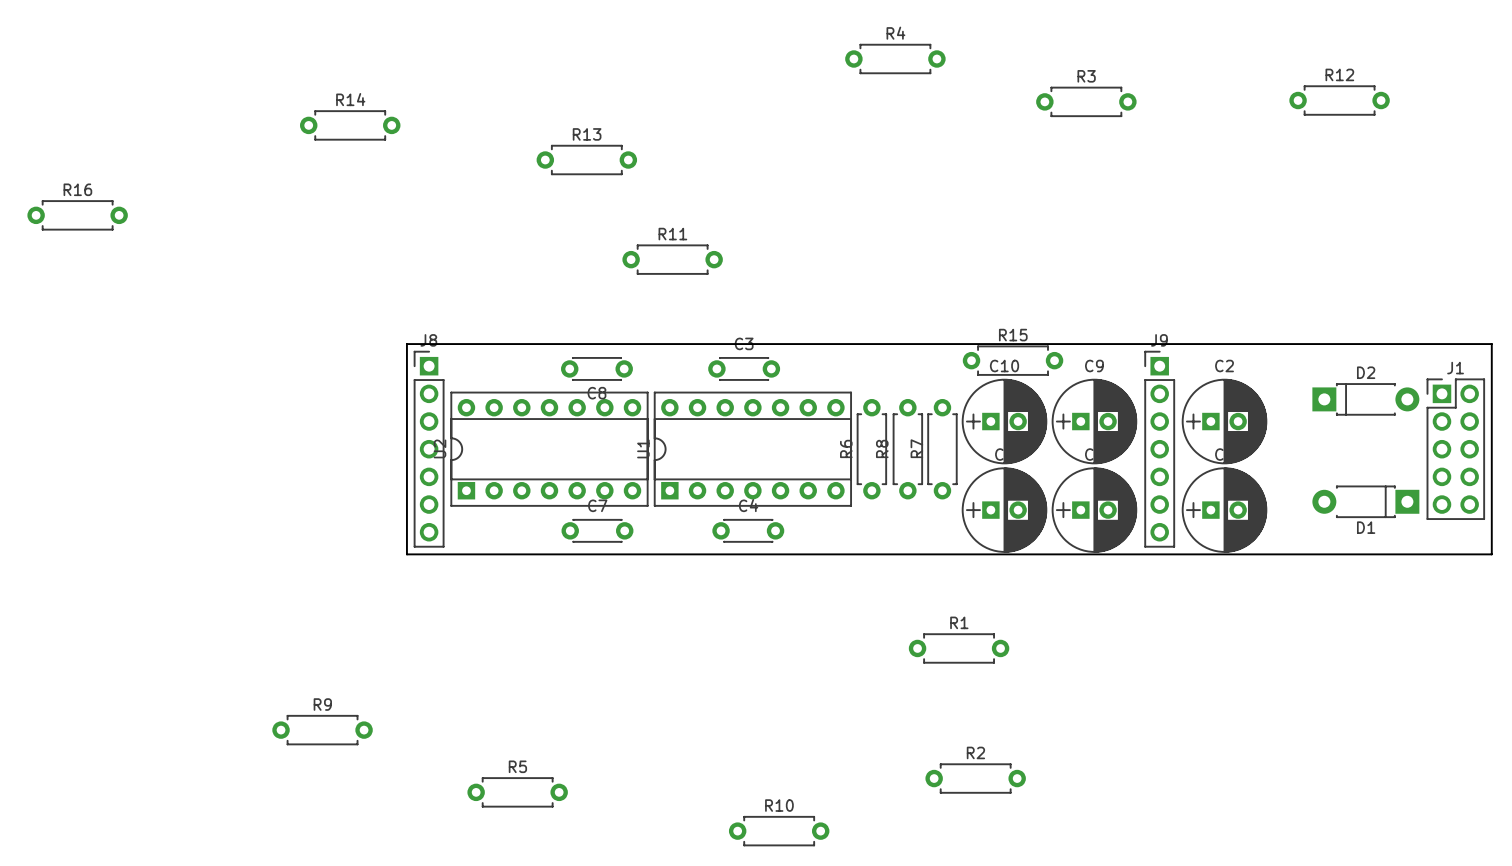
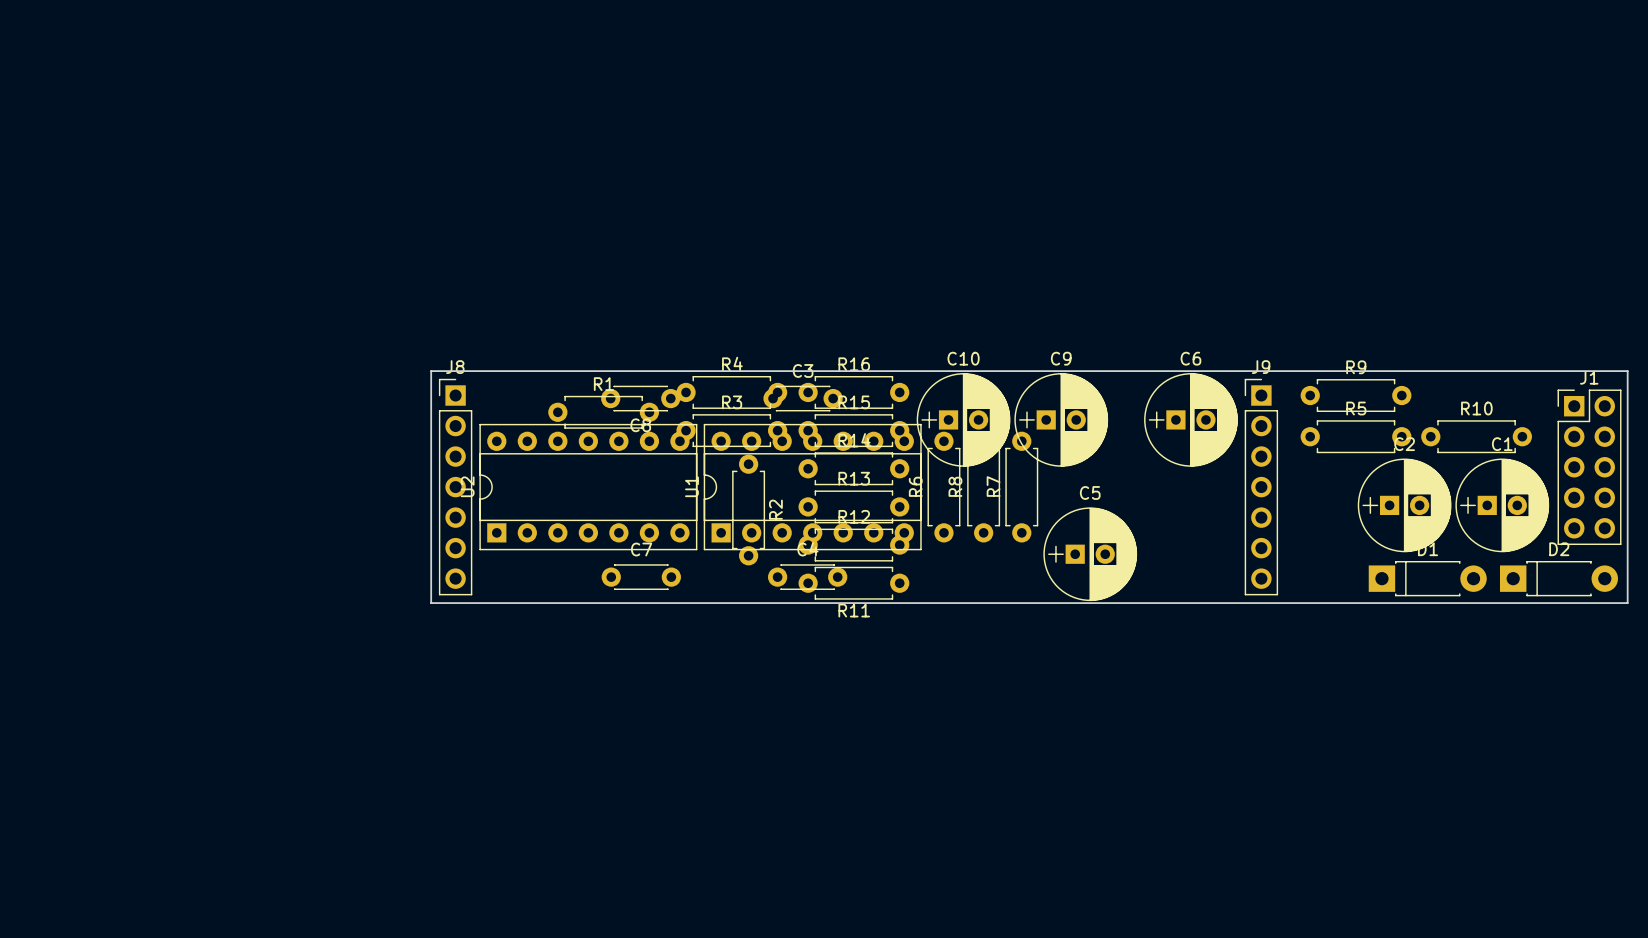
R4 position: (895, 59) -> (731, 392)
R12 position: (1339, 100) -> (853, 545)
R3 position: (1086, 101) -> (731, 430)
R14 position: (350, 125) -> (853, 468)
R13 position: (586, 160) -> (853, 506)
R16 position: (77, 215) -> (853, 392)
R11 name position: R11 (672, 234) -> R11 (854, 610)
R11 position: (672, 259) -> (853, 583)
R15 position: (1013, 360) -> (853, 430)
D2 position: (1365, 399) -> (1558, 578)
C10 position: (1004, 421) -> (963, 419)
C9 position: (1094, 421) -> (1061, 419)
C2 position: (1224, 421) -> (1404, 505)
J1 position: (1455, 449) -> (1589, 467)
D1 rotation: 0° (1365, 501) -> 180° (1427, 578)
C6 position: (1094, 510) -> (1190, 419)
C1 position: (1224, 510) -> (1502, 505)
R1 position: (959, 648) -> (603, 412)
R9 position: (322, 730) -> (1356, 395)
R2 rotation: 0° (975, 778) -> 90° clockwise (748, 509)
R2 position: (975, 778) -> (748, 509)
R5 position: (517, 792) -> (1356, 436)
R10 position: (779, 831) -> (1476, 436)

